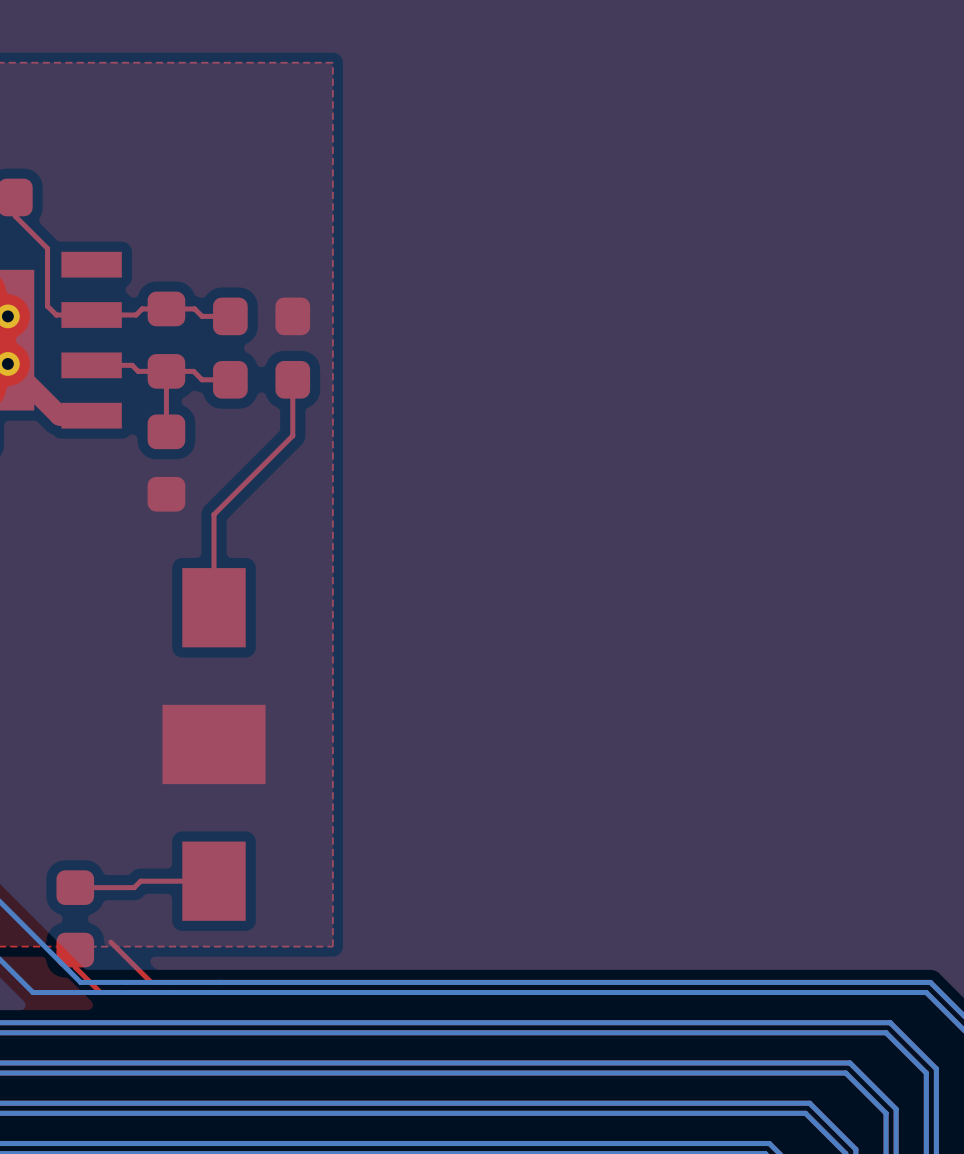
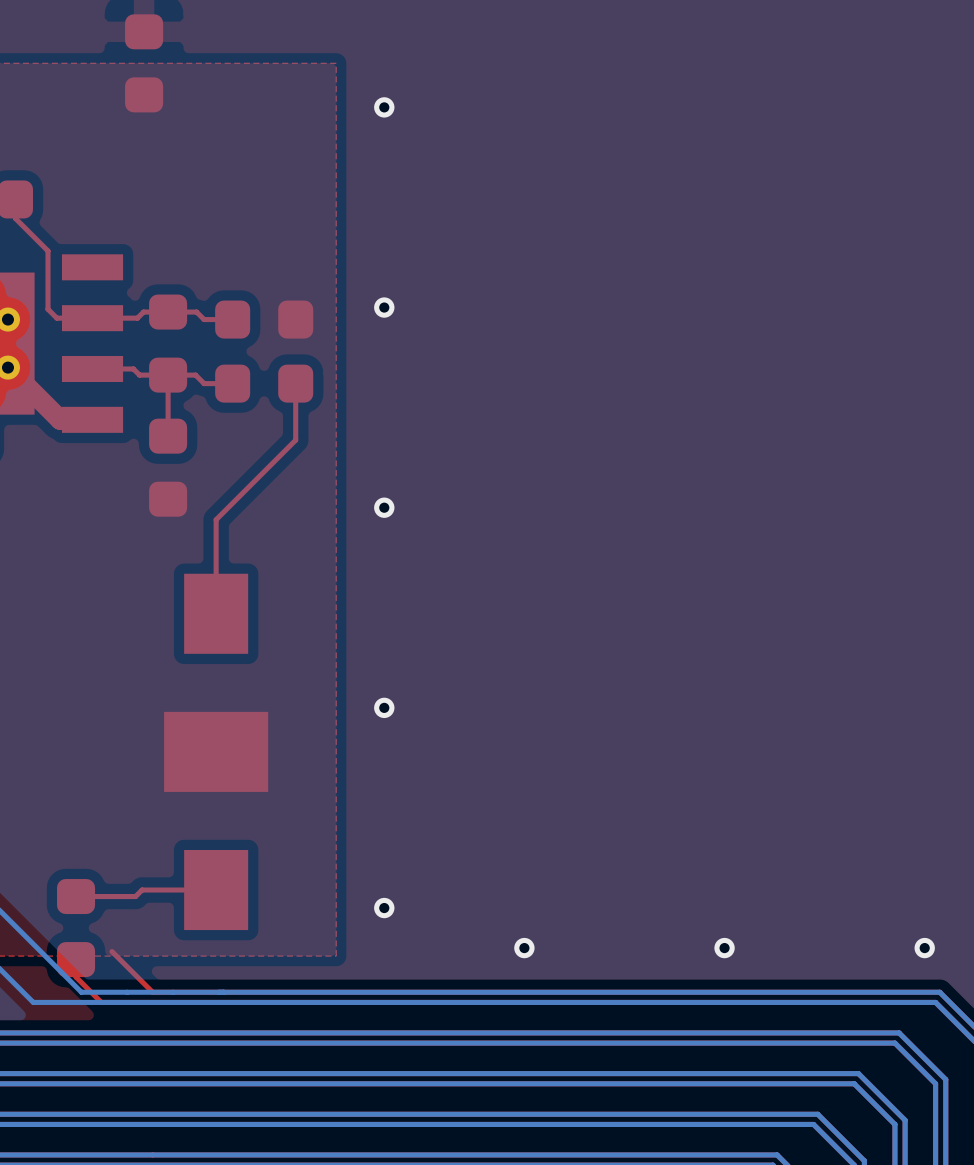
part: none -> (144, 63)
via: none -> (384, 107)
via: none -> (384, 307)
via: none -> (384, 507)
via: none -> (384, 707)
via: none -> (384, 908)
via: none -> (524, 948)
via: none -> (724, 948)
via: none -> (924, 948)

